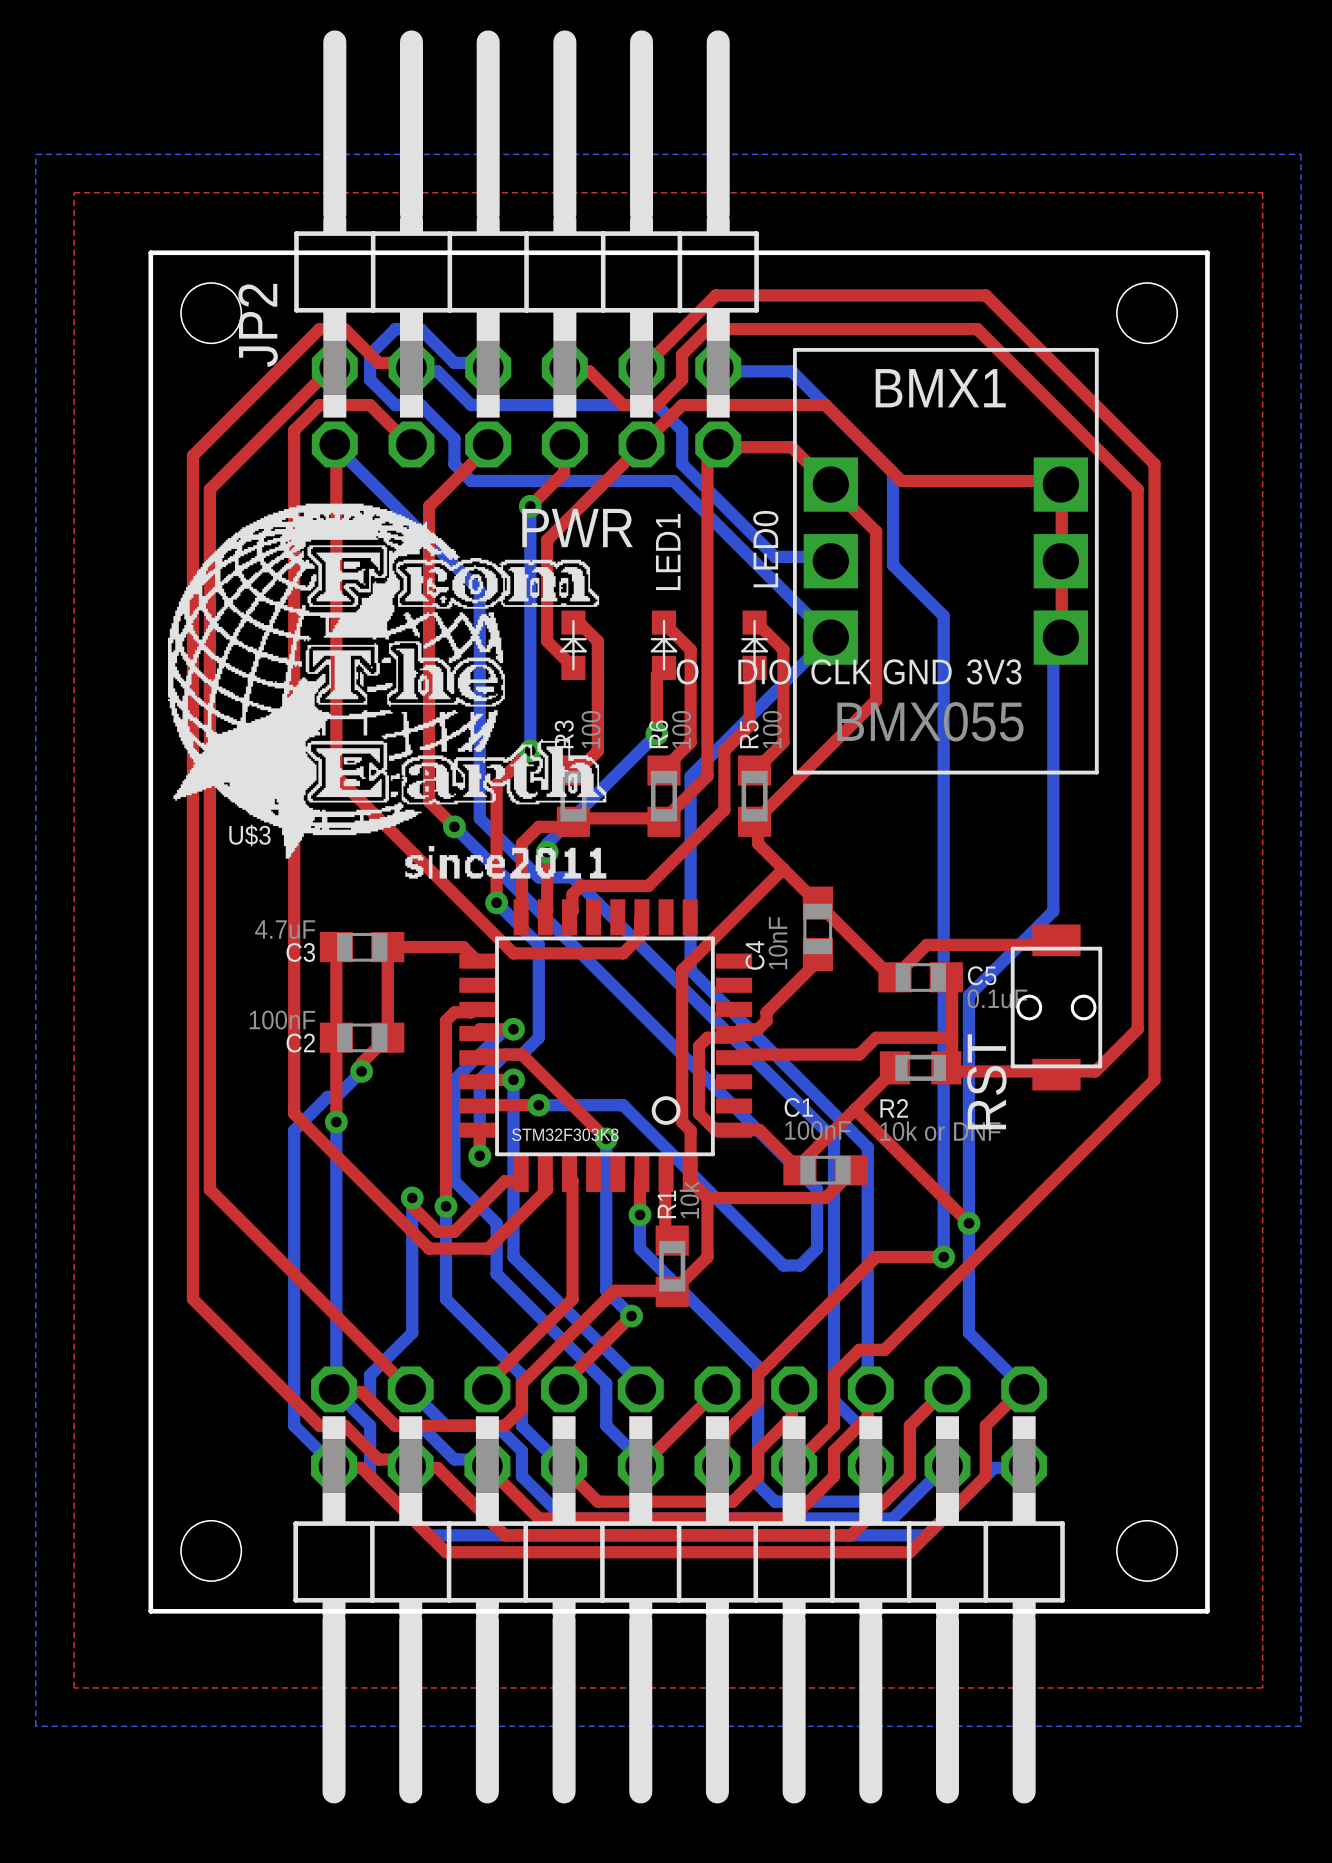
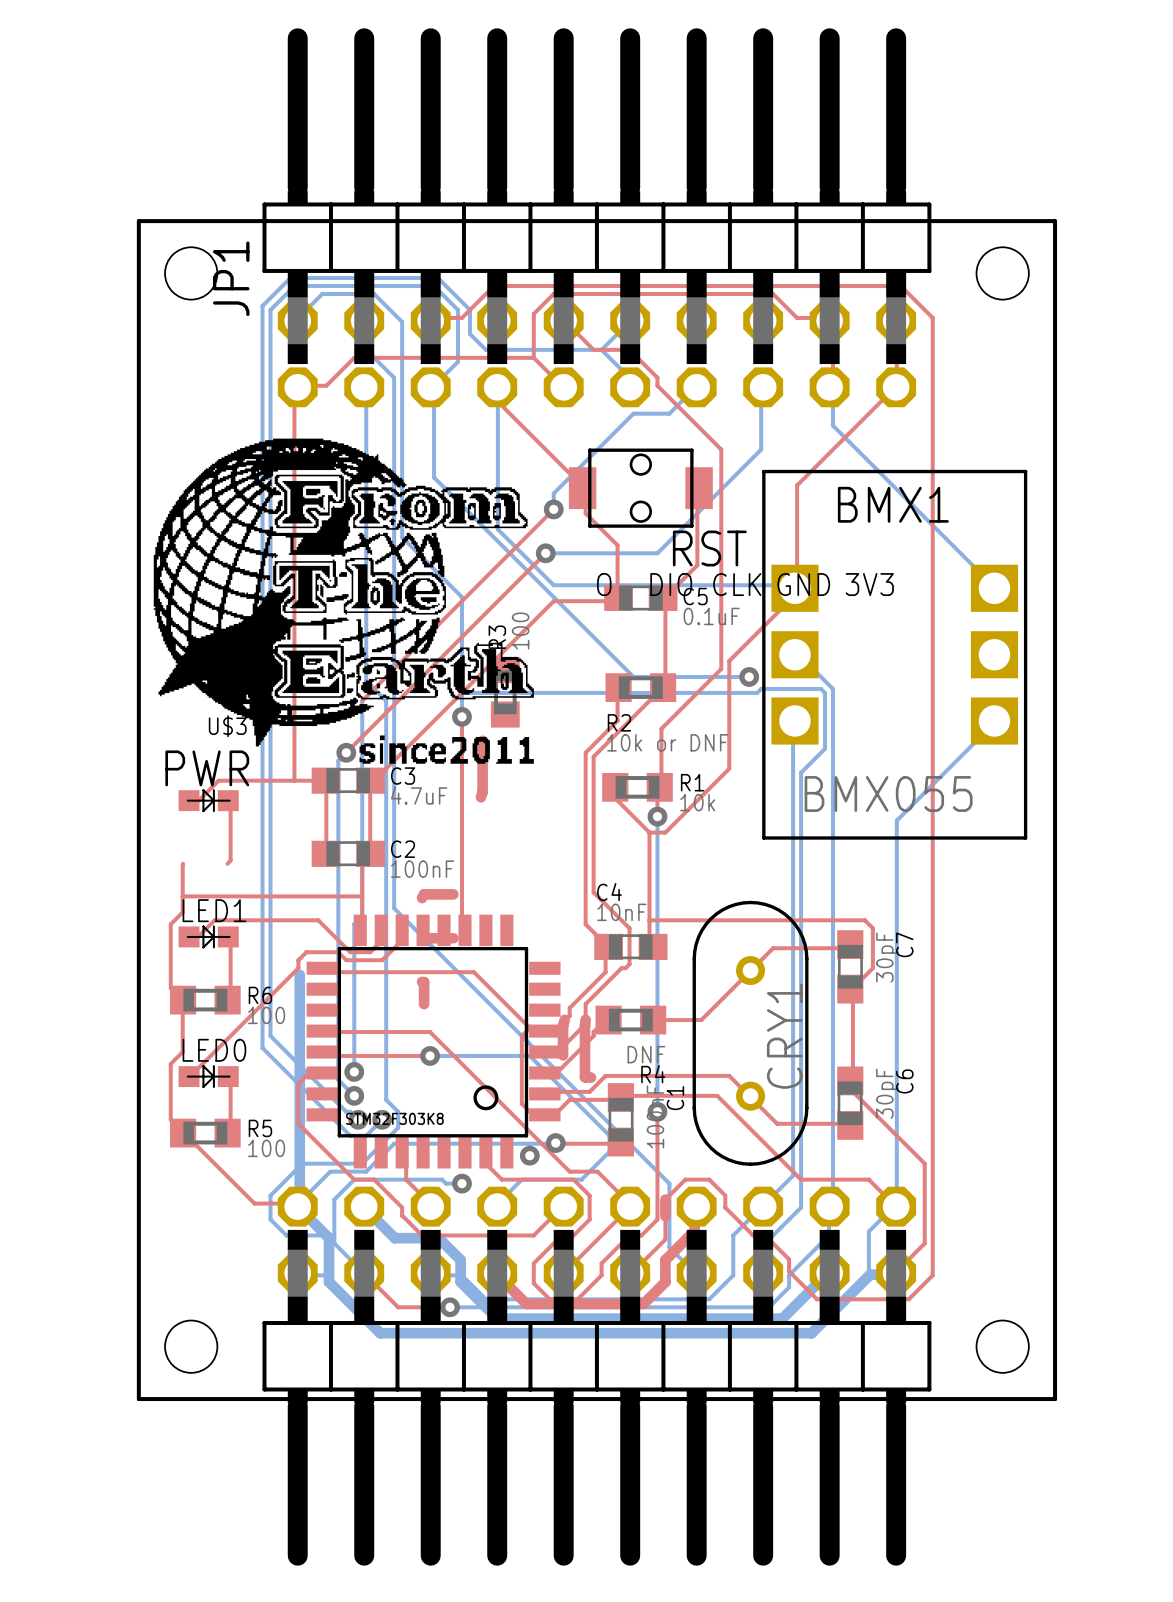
bottom zone outline: (35, 154) (1301, 154) (1301, 1726) (35, 1726) (35, 154) -> none
top zone outline: (74, 192) (1262, 192) (1262, 1687) (74, 1687) (74, 192) -> none
JP2: (526, 248) -> none
JP1: none -> (596, 217)
top track: (334, 367) (327, 371) (209, 489) (209, 1189) (410, 1389) -> none
top track: (411, 367) (403, 362) (378, 362) (344, 329) (319, 329) (192, 455) (192, 1299) (319, 1425) (344, 1425) (378, 1459) (403, 1459) (412, 1467) (437, 1467) (505, 1535) (850, 1535) (909, 1476) (909, 1425) (947, 1389) -> none
bottom track: (411, 367) (412, 371) (437, 371) (471, 405) (656, 405) (682, 430) (682, 464) (774, 556) (825, 556) (830, 561) -> (364, 320) (366, 321) (366, 349) (394, 377) (394, 908) (669, 1183) (669, 1247) (696, 1273)
bottom track: (488, 367) (488, 362) (454, 362) (420, 329) (395, 329) (370, 354) (370, 379) (395, 405) (420, 405) (454, 438) -> (297, 320) (322, 294) (374, 294) (402, 321) (402, 382)
top track: (564, 367) (572, 371) (589, 371) (623, 405) (656, 405) (682, 379) (682, 354) (707, 329) (977, 329) (1137, 489) (1137, 1029) (1095, 1071) (1061, 1071) (1056, 1074) (1053, 1071) (952, 1071) (946, 1067) (952, 1063) (952, 978) (946, 977) -> none
top track: (641, 367) (715, 295) (985, 295) (1154, 464) (1154, 1079) (884, 1349) (859, 1349) (834, 1375) (834, 1425) (794, 1466) -> (563, 320) (593, 349) (629, 349) (657, 377) (657, 385) (721, 449) (721, 669) (661, 728) (661, 784) (657, 788) (657, 816)
bottom track: (718, 367) (724, 371) (791, 371) (893, 472) (893, 565) (943, 615) (943, 1257) -> (630, 320) (601, 349)
top track: none -> (896, 320) (896, 387) (797, 485) (797, 585) (793, 589) (793, 597) (729, 661) (729, 768) (665, 832) (649, 832)
bottom track: none -> (601, 349) (485, 349) (469, 333) (469, 309) (438, 278) (290, 278) (262, 305) (262, 1047) (350, 1135) (366, 1135) (382, 1119)
bottom track: none -> (601, 349) (629, 377) (630, 387)
top track: none -> (533, 357) (354, 357) (326, 385) (298, 385) (294, 389) (294, 780)
top track: none -> (533, 357) (563, 387)
top track: none -> (533, 357) (533, 313) (553, 294) (773, 294) (797, 317) (829, 317) (829, 320) (832, 321) (832, 385) (829, 387)
bottom track width: thick (454, 438) (454, 464) -> thin (402, 382) (402, 404)
top track: (334, 444) (336, 447) (336, 776) (513, 953) (623, 953) (640, 936) (640, 919) (641, 917) -> none
bottom track: (334, 444) (479, 590) (479, 818) (538, 877) (572, 877) (834, 1138) (834, 1400) (867, 1434) (867, 1459) (870, 1466) -> (461, 692) (757, 692) (761, 688) (821, 688) (825, 692) (825, 748) (801, 772) (801, 1207) (765, 1243) (765, 1271) (763, 1273)
bottom track: none -> (364, 387) (366, 389) (366, 680) (386, 700) (386, 1099) (398, 1111) (398, 1127) (362, 1163) (302, 1163) (270, 1195) (270, 1219) (286, 1235) (334, 1235)
top track: (411, 444) (370, 405) (319, 405) (294, 430) (294, 1113) (429, 1248) (488, 1248) (547, 1189) (545, 1173) -> none
top track: (488, 444) (488, 447) (429, 506) (429, 801) (454, 826) -> none
top track: (564, 444) (564, 472) (530, 506) -> (497, 387) (497, 401) (585, 489) (585, 513) (617, 545) (618, 597) (617, 601) (553, 601) (374, 780) (370, 780) (370, 853) (362, 864) (362, 928) (360, 930)
bottom track: none -> (497, 387) (497, 529) (553, 585) (793, 585) (794, 588)
bottom track: none -> (696, 387) (669, 413) (633, 413) (553, 493) (553, 509)
bottom track: none -> (763, 387) (761, 389) (761, 449) (657, 553) (545, 553)
bottom track: none -> (829, 387) (832, 389) (832, 425) (994, 588)
bottom track: (454, 464) (471, 481) (673, 481) (830, 637) (690, 776) (690, 970) (867, 1147) (867, 1383) (870, 1389) -> (402, 404) (402, 537) (461, 597) (461, 716)
bottom track: (530, 506) (530, 750) -> none
via: (530, 506) -> none
PWR name position: PWR (577, 528) -> PWR (207, 768)
LED1 name position: LED1 (668, 552) -> LED1 (214, 910)
top track: none -> (699, 488) (697, 489) (697, 565) (663, 597) (665, 601) (665, 684) (593, 756) (593, 892) (629, 928) (629, 964) (625, 968) (621, 968) (585, 1004) (585, 1024) (557, 1051) (544, 1052)
BMX1 position: (945, 561) -> (894, 654)
top track: none -> (553, 509) (362, 700)
via: none -> (553, 509)
top track: (573, 622) (580, 624) (597, 641) (597, 750) (580, 767) (573, 770) -> none
top track: (664, 622) (690, 649) (690, 742) (664, 770) -> none
top track: (754, 622) (783, 649) (783, 742) (754, 770) -> none
top track: none -> (545, 553) (346, 752)
via: none -> (545, 553)
top track: (1060, 637) (1060, 484) (1053, 481) (901, 481) (825, 405) (682, 405) (547, 540) (547, 641) (573, 667) -> none
bottom track: (1060, 637) (1053, 641) (1053, 911) (968, 995) (968, 1332) (1024, 1389) -> none
PWR rotation: 0° (573, 645) -> 90° clockwise (208, 800)
PWR position: (573, 645) -> (208, 800)
LED1 rotation: 0° (664, 645) -> 90° clockwise (208, 936)
LED1 position: (664, 645) -> (208, 936)
LED0 rotation: 0° (754, 645) -> 90° clockwise (208, 1076)
LED0 position: (754, 645) -> (208, 1076)
top track: (664, 667) (656, 675) (656, 734) -> none
top track: (754, 667) (749, 675) (749, 725) (724, 750) (724, 809) (648, 885) (580, 885) (572, 894) (572, 911) (569, 917) -> none
bottom track: (656, 734) (547, 843) (547, 852) -> none
via: (656, 734) -> none
top track: (530, 750) (496, 784) (496, 902) -> none
via: (530, 750) -> none
bottom track: none -> (794, 654) (797, 653) (832, 688) (832, 1203) (829, 1207) (829, 1235) (789, 1275) (789, 1287) (769, 1307) (450, 1307)
bottom track: none -> (749, 676) (633, 676) (434, 477) (434, 389) (430, 387) (457, 361) (457, 309) (434, 286) (294, 286) (270, 309) (270, 1036) (346, 1111) (350, 1111) (358, 1119)
via: none -> (749, 676)
top track: none -> (618, 687) (617, 720) (585, 752) (585, 924) (608, 946) (605, 948) (605, 972) (569, 1008) (569, 1016) (557, 1028) (545, 1028) (544, 1031)
R6 rotation: 0° (664, 796) -> 90° clockwise (205, 1000)
R6 position: (664, 796) -> (205, 1000)
R5 rotation: 0° (754, 796) -> 90° clockwise (205, 1133)
R5 position: (754, 796) -> (205, 1133)
bottom track: none -> (362, 700) (362, 916) (354, 924) (354, 1071)
top track: none -> (461, 716) (461, 928) (464, 930)
via: none -> (461, 716)
bottom track: (454, 826) (817, 1189) (817, 1248) (800, 1265) (783, 1265) (623, 1105) (538, 1105) -> none
via: (454, 826) -> none
via: (547, 852) -> none
bottom track: none -> (346, 752) (338, 760) (338, 1079) (354, 1095)
via: none -> (346, 752)
top track: (783, 869) (682, 970) (682, 1122) (690, 1130) (690, 1181) (707, 1197) -> none
bottom track: (496, 902) (538, 944) (538, 1037) (521, 1054) (505, 1054) (479, 1079) (479, 1155) -> none
via: (496, 902) -> none
top track: none -> (615, 787) (617, 788) (617, 800) (649, 832)
top track: (521, 917) (521, 843) (538, 826) (572, 826) (573, 821) (580, 818) (656, 818) (664, 821) (707, 776) (707, 455) (718, 444) (724, 447) (791, 447) (876, 531) (876, 700) (754, 821) (758, 826) (758, 843) (893, 978) (926, 944) (1053, 944) (1056, 940) -> none
top track: none -> (189, 800) (198, 800) (218, 780) (326, 780) (326, 853)
top track: none -> (228, 800) (230, 800) (230, 860) (227, 863)
C4 rotation: 0° (817, 928) -> 90° clockwise (630, 946)
C4 position: (817, 928) -> (630, 946)
C3 value position: 4.7uF (285, 929) -> 4.7uF (419, 795)
bottom track: none -> (657, 816) (657, 1111)
via: none -> (657, 816)
top track: (336, 947) (336, 1122) -> none
C3 position: (362, 947) -> (348, 780)
C3 name position: C3 (300, 952) -> C3 (403, 776)
top track: (817, 954) (817, 961) (766, 1012) (766, 1020) (758, 1029) (741, 1029) (734, 1033) (732, 1037) (707, 1037) (699, 1046) (699, 1113) (715, 1130) (759, 1130) (799, 1170) (800, 1164) (894, 1067) -> none
top track: none -> (649, 832) (649, 944) (653, 946)
top track: (477, 961) (463, 947) (387, 947) (387, 1037) (361, 1063) (361, 1071) -> none
C5 position: (920, 977) -> (640, 597)
RST rotation: 0° (1056, 1007) -> 90° clockwise (640, 488)
RST position: (1056, 1007) -> (640, 488)
top track: (477, 1009) (471, 1012) (454, 1012) (446, 1020) (446, 1206) -> none
C2 value position: 100nF (282, 1020) -> 100nF (422, 869)
bottom track: (513, 1029) (505, 1029) (454, 1079) (454, 1181) (496, 1223) (496, 1273) (606, 1383) (606, 1425) (640, 1459) (640, 1466) -> none
via: (513, 1029) -> none
top track: none -> (182, 896) (362, 896)
C2 position: (362, 1037) -> (348, 853)
top track: (952, 1037) (876, 1037) (859, 1054) (741, 1054) (734, 1057) -> none
C2 name position: C2 (300, 1043) -> C2 (403, 849)
part position: (605, 1045) -> (433, 1041)
top track: (477, 1057) (479, 1054) (521, 1054) (606, 1138) -> none
top track: none -> (649, 920) (864, 920) (872, 928) (872, 968) (850, 989) (852, 992) (852, 1079) (850, 1080) (852, 1083) (852, 1091) (924, 1163) (924, 1243) (896, 1273)
R2 position: (920, 1067) -> (640, 687)
top track: none -> (381, 930) (378, 932) (378, 944) (370, 952) (350, 952) (318, 920) (214, 920) (198, 936) (189, 936)
top track: none -> (402, 930) (402, 940) (382, 960) (346, 960) (338, 952) (306, 952) (298, 960) (298, 968) (189, 1076)
bottom track: (361, 1071) (336, 1096) (327, 1096) (294, 1130) (294, 1425) (334, 1466) -> (994, 720) (896, 820) (896, 1203) (896, 1206) (892, 1207) (868, 1231) (868, 1271) (809, 1331) (382, 1331) (326, 1275) (298, 1275) (297, 1273)
via: (361, 1071) -> none
top track: none -> (228, 936) (230, 940) (230, 1000) (227, 1000)
bottom track: (513, 1079) (513, 1257) (640, 1383) (640, 1389) -> none
via: (513, 1079) -> none
RST name position: RST (986, 1081) -> RST (709, 548)
top track: none -> (850, 944) (848, 948) (773, 948) (701, 1020) (653, 1020)
top track: (538, 1105) (477, 1106) -> none
via: (538, 1105) -> none
top track: (855, 1109) (968, 1223) -> none
C7: none -> 30pF (850, 966)
top track: none -> (322, 968) (322, 972) (473, 972) (529, 1028)
via: (336, 1122) -> none
bottom track: (606, 1138) (606, 1290) (631, 1316) -> none
via: (606, 1138) -> none
via: (479, 1155) -> none
C1 rotation: 0° (825, 1170) -> 90° clockwise (620, 1119)
C1 position: (825, 1170) -> (620, 1119)
top track: (851, 1170) (825, 1197) (707, 1197) -> none
top track: (521, 1173) (521, 1181) (505, 1181) (454, 1231) (437, 1231) (412, 1206) (412, 1197) -> none
top track: (569, 1173) (572, 1181) (572, 1299) (488, 1383) (487, 1389) -> (402, 1152) (406, 1155) (406, 1179) (430, 1203) (430, 1206)
top track: none -> (608, 1020) (605, 1020) (593, 1032) (593, 1036) (557, 1071) (544, 1072)
R4: none -> DNF (630, 1020)
CRY1: none -> (750, 1033)
bottom track: (412, 1197) (412, 1332) (370, 1375) (370, 1400) (395, 1425) (420, 1425) (454, 1459) (479, 1459) (487, 1466) -> (794, 720) (793, 724) (793, 1175) (733, 1235) (733, 1275) (709, 1299) (485, 1299) (461, 1275) (434, 1275) (430, 1273)
via: (412, 1197) -> none
top track: (707, 1197) (707, 1257) (672, 1291) (614, 1290) (521, 1383) (521, 1408) (505, 1425) (395, 1425) (361, 1391) (336, 1391) (334, 1389) -> (183, 863) (182, 912) (170, 924) (170, 988) (182, 1000) (182, 1051) (170, 1063) (170, 1119) (254, 1203) (294, 1203) (297, 1206)
bottom track: (446, 1206) (446, 1299) (521, 1375) (521, 1425) (564, 1466) -> none
via: (446, 1206) -> none
top track: none -> (322, 1052) (322, 1055) (430, 1055)
bottom track: (640, 1214) (640, 1248) (758, 1366) (758, 1484) (774, 1501) (884, 1501) (909, 1476) (909, 1425) (947, 1389) -> none
via: (640, 1214) -> none
bottom track: none -> (430, 1055) (529, 1055) (609, 1135) (609, 1151) (581, 1179) (521, 1179) (497, 1203) (497, 1206)
via: none -> (430, 1055)
via: (968, 1223) -> none
via: none -> (354, 1071)
top track: none -> (322, 1072) (318, 1075) (306, 1075) (298, 1083) (298, 1123) (354, 1179) (374, 1179) (402, 1207) (402, 1215) (422, 1235) (533, 1235) (563, 1206)
top track: none -> (228, 1076) (230, 1079) (230, 1131) (227, 1133)
top track: (943, 1257) (876, 1257) (758, 1375) (758, 1381) -> (430, 320) (434, 317) (461, 317) (493, 286) (900, 286) (932, 317) (932, 1275) (908, 1299) (817, 1299) (789, 1271) (789, 1259) (765, 1235) (753, 1235) (725, 1207) (725, 1195) (709, 1179) (685, 1179) (665, 1199)
via: (943, 1257) -> none
top track: none -> (544, 1093) (545, 1091) (589, 1091) (605, 1075) (729, 1075) (777, 1123) (848, 1123) (850, 1125)
via: none -> (354, 1095)
R1 rotation: 0° (672, 1266) -> 90° clockwise (637, 787)
R1 position: (672, 1266) -> (637, 787)
C6: none -> 30pF (850, 1103)
top track: none -> (657, 1111) (657, 1219) (641, 1235) (629, 1235) (601, 1263) (601, 1275) (577, 1299) (549, 1299) (533, 1283) (533, 1263) (553, 1243) (565, 1243) (589, 1219) (589, 1195) (573, 1179) (501, 1179) (489, 1167) (489, 1155) (485, 1152)
via: none -> (657, 1111)
via: none -> (358, 1119)
via: none -> (382, 1119)
top track: none -> (620, 1142) (617, 1143) (565, 1143)
top track: (631, 1316) (564, 1383) (564, 1389) -> none
bottom track: none -> (565, 1143) (394, 1143) (366, 1171) (330, 1171) (298, 1203) (297, 1206)
via: none -> (529, 1155)
bottom track: none -> (461, 1183) (446, 1183) (442, 1179) (354, 1179) (334, 1199) (334, 1243) (364, 1273)
via: none -> (461, 1183)
top track: (717, 1389) (640, 1466) -> (322, 1031) (430, 1032) (569, 1171) (597, 1171) (629, 1203) (629, 1207) (563, 1273)
top track: (870, 1389) (867, 1391) (867, 1417) (834, 1451) (834, 1476) (791, 1518) (538, 1518) (487, 1466) -> none
top track: (1024, 1389) (985, 1425) (985, 1476) (909, 1552) (446, 1552) (361, 1467) (336, 1467) (334, 1466) -> (896, 1206) (868, 1179) (801, 1179) (717, 1095) (621, 1095) (617, 1099) (569, 1099) (557, 1111) (545, 1111) (544, 1114) (541, 1111) (529, 1111) (521, 1103) (521, 1036) (529, 1028)
top track: (758, 1400) (724, 1434) (724, 1459) (717, 1466) -> (665, 1216) (665, 1239) (630, 1273)
top track: none -> (364, 1273) (398, 1307) (450, 1307)
via: none -> (450, 1307)

